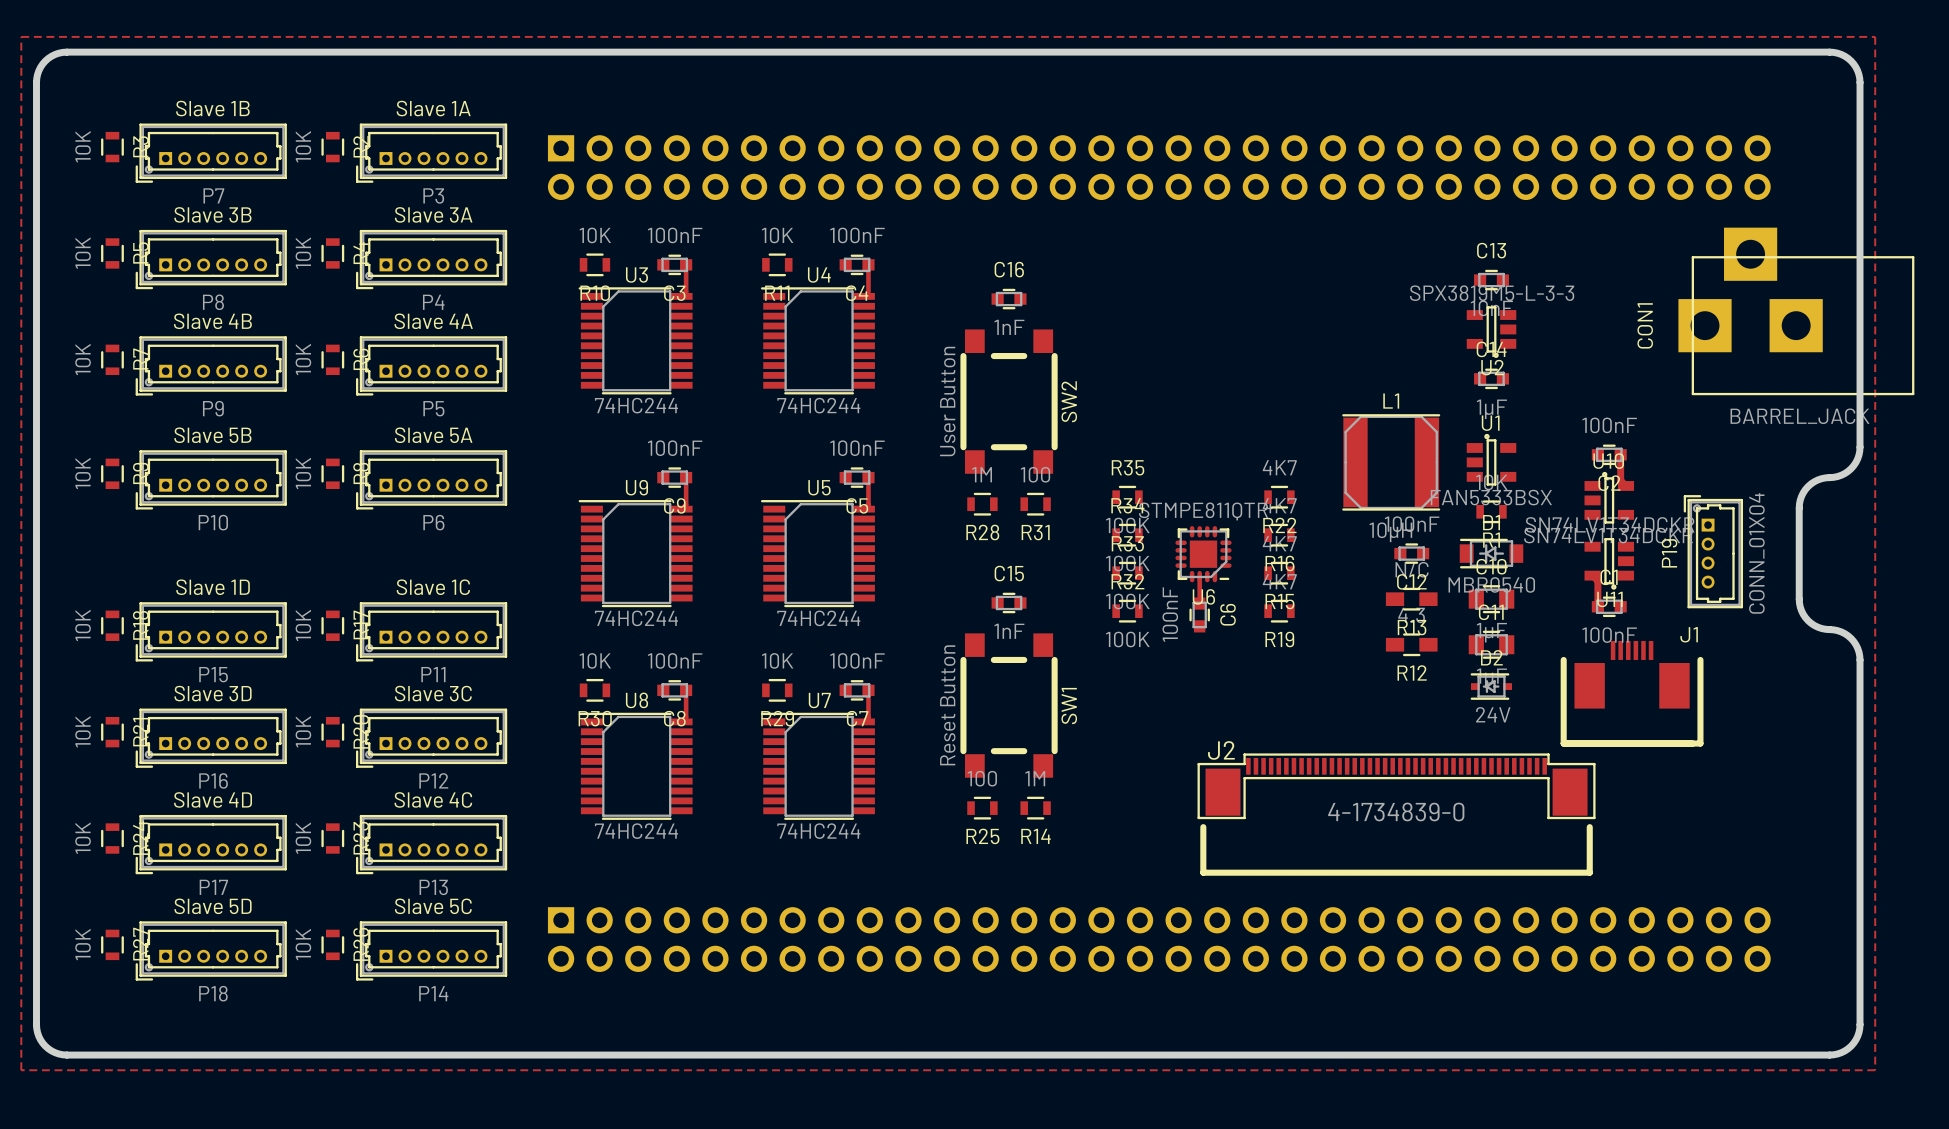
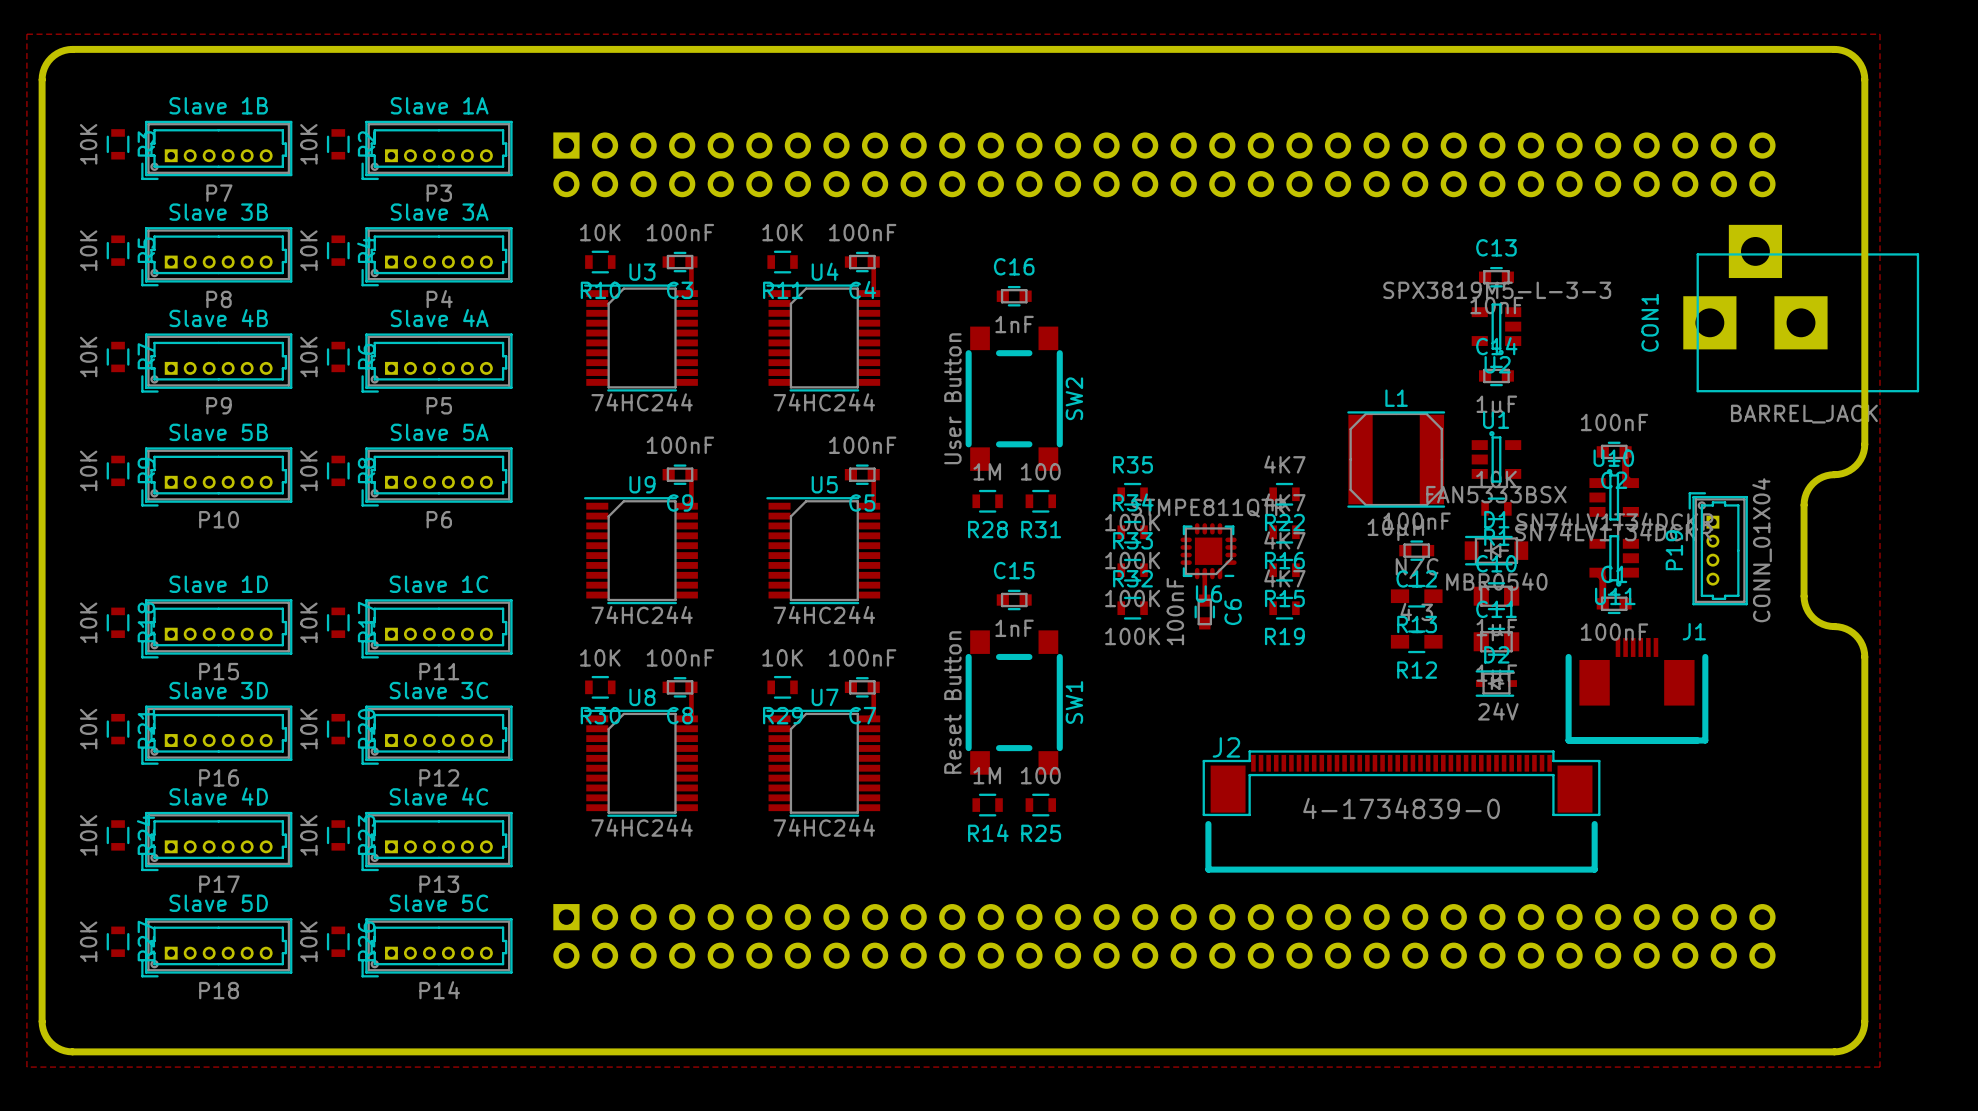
R25 value: 100 (982, 778) -> 1M (987, 775)
R14 value: 1M (1035, 778) -> 100 (1040, 775)
R25 name: R25 (982, 836) -> R14 (988, 832)
R14 name: R14 (1035, 836) -> R25 (1041, 833)

